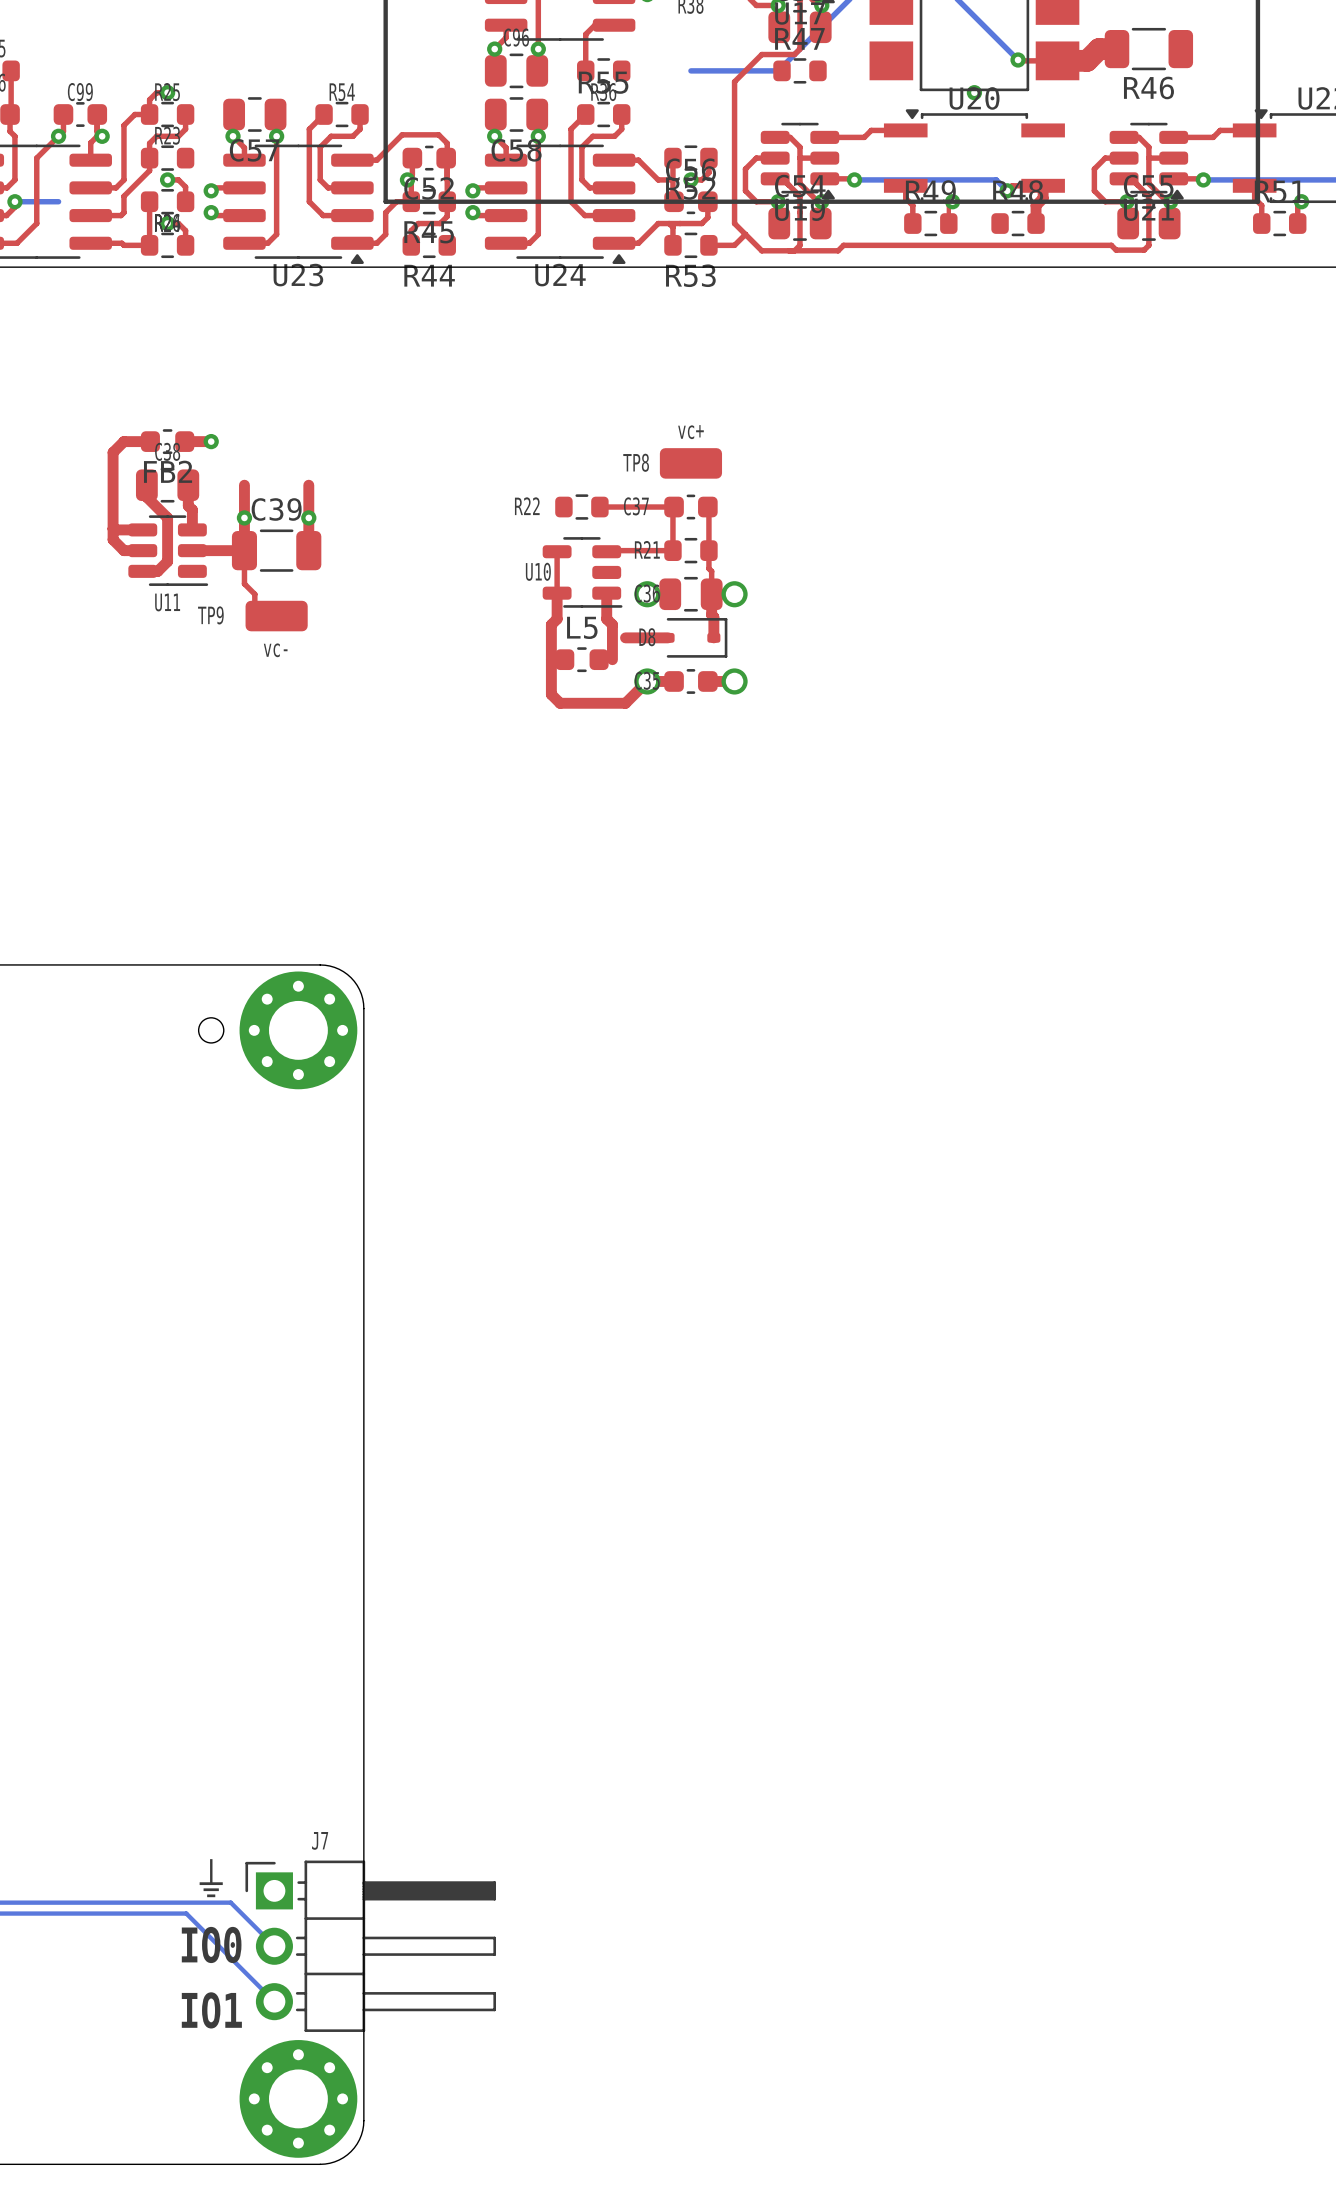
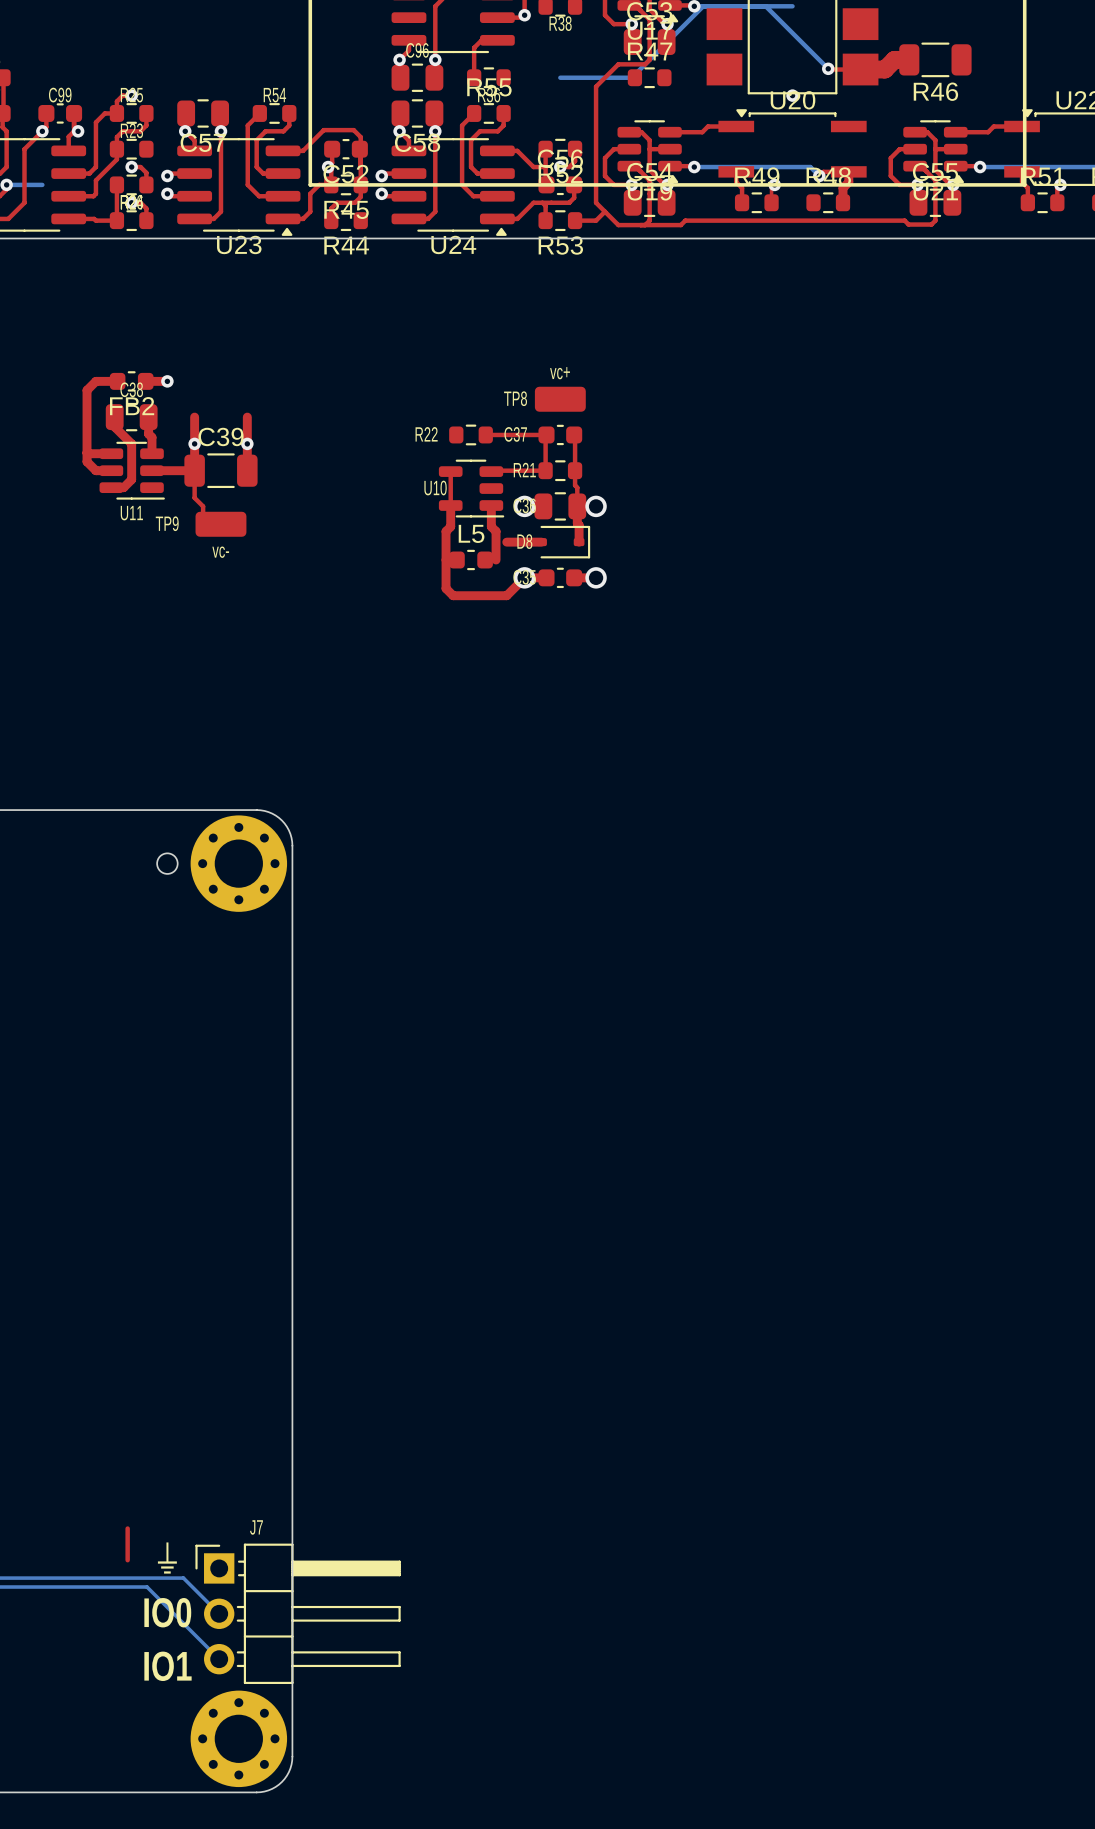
top track: none -> (127, 1528) (127, 1560)

